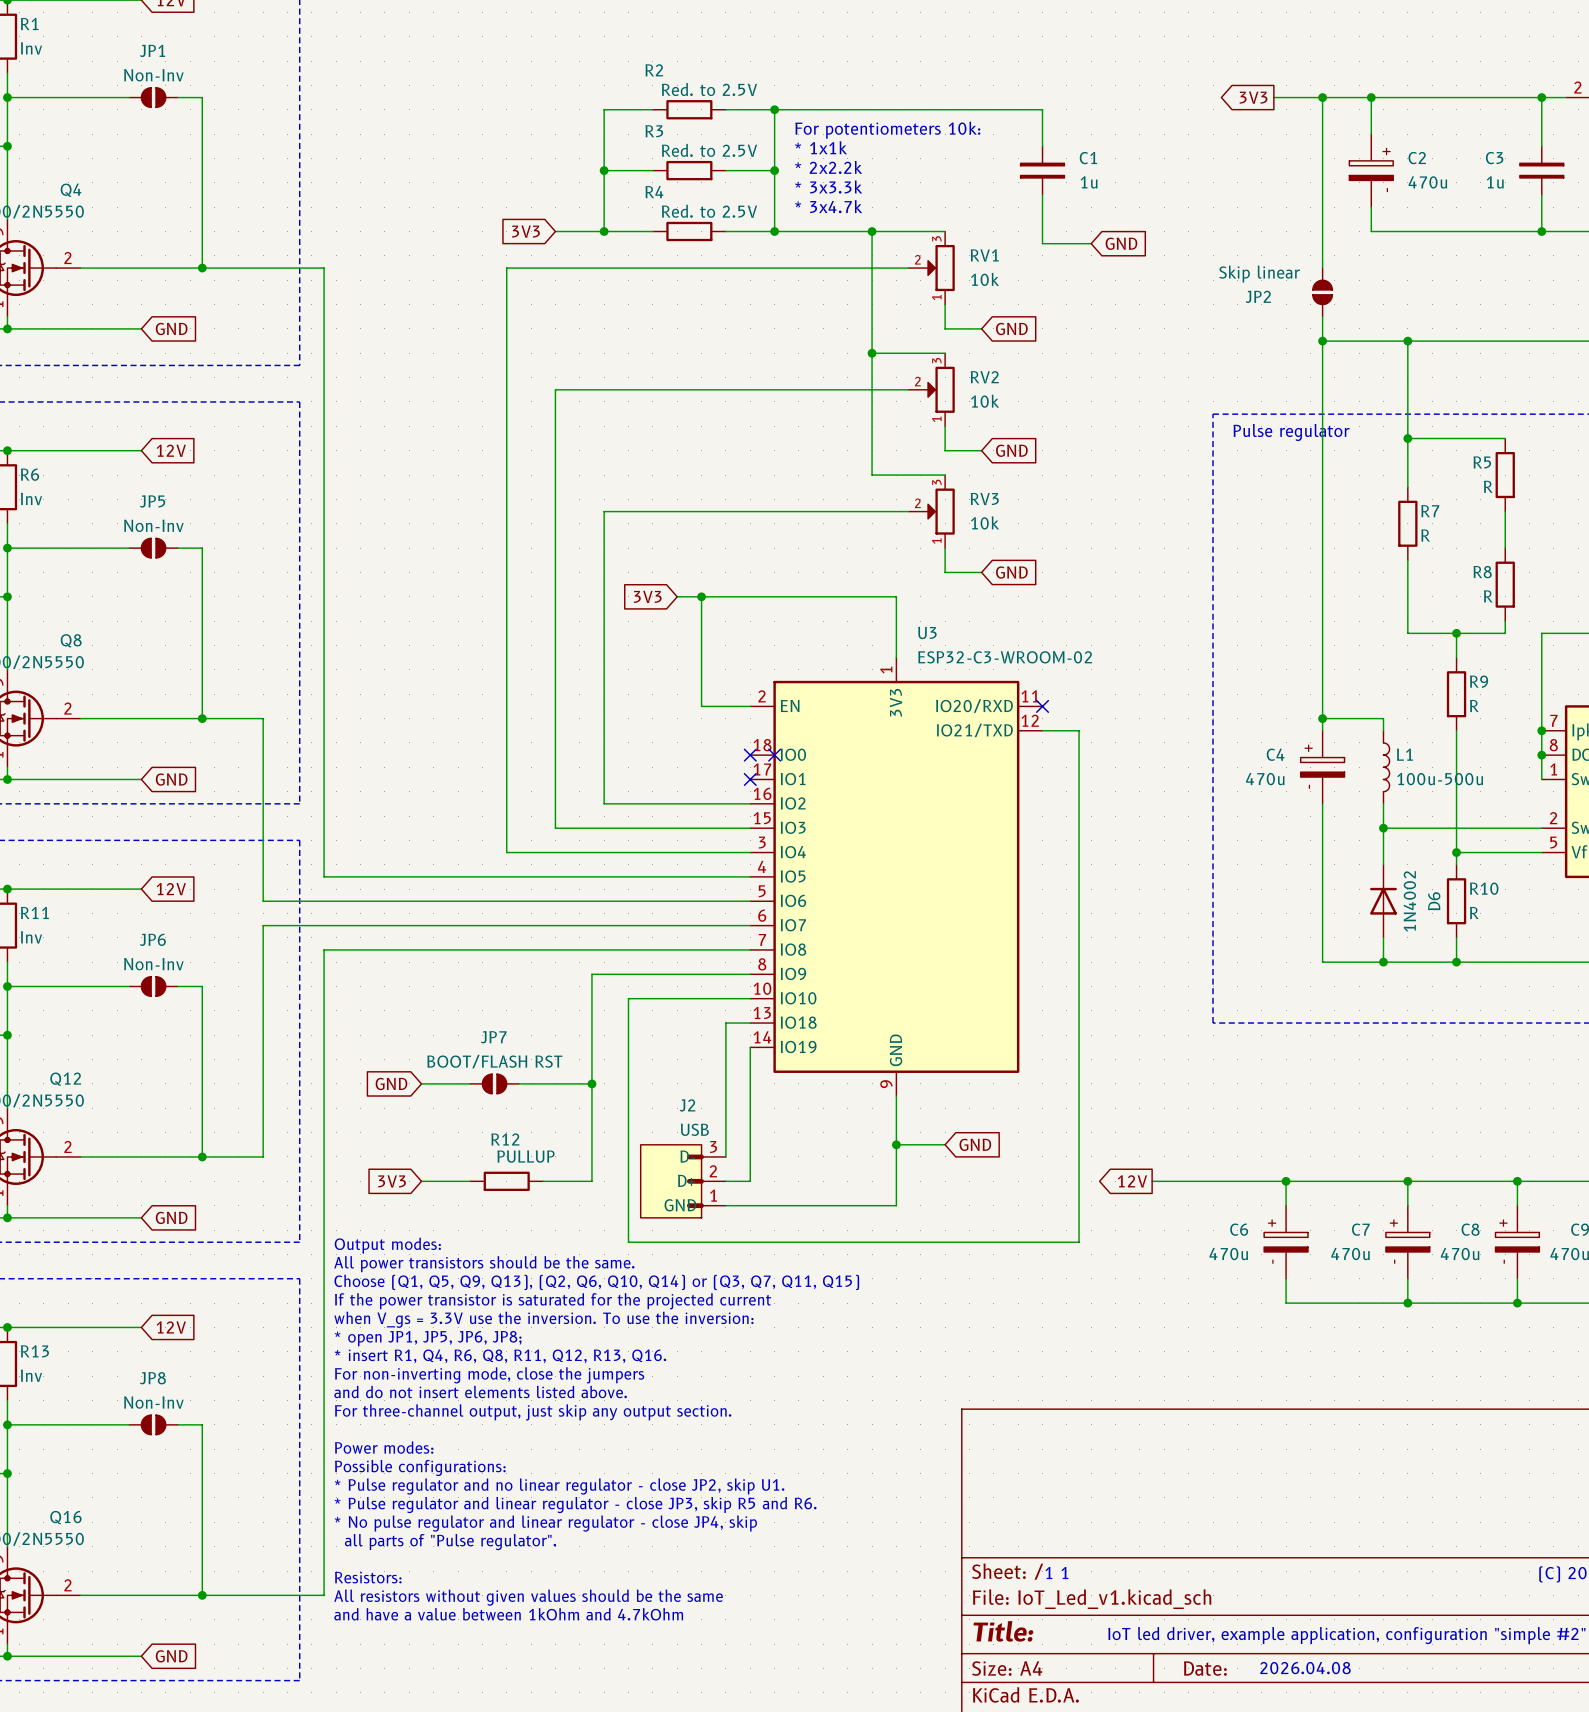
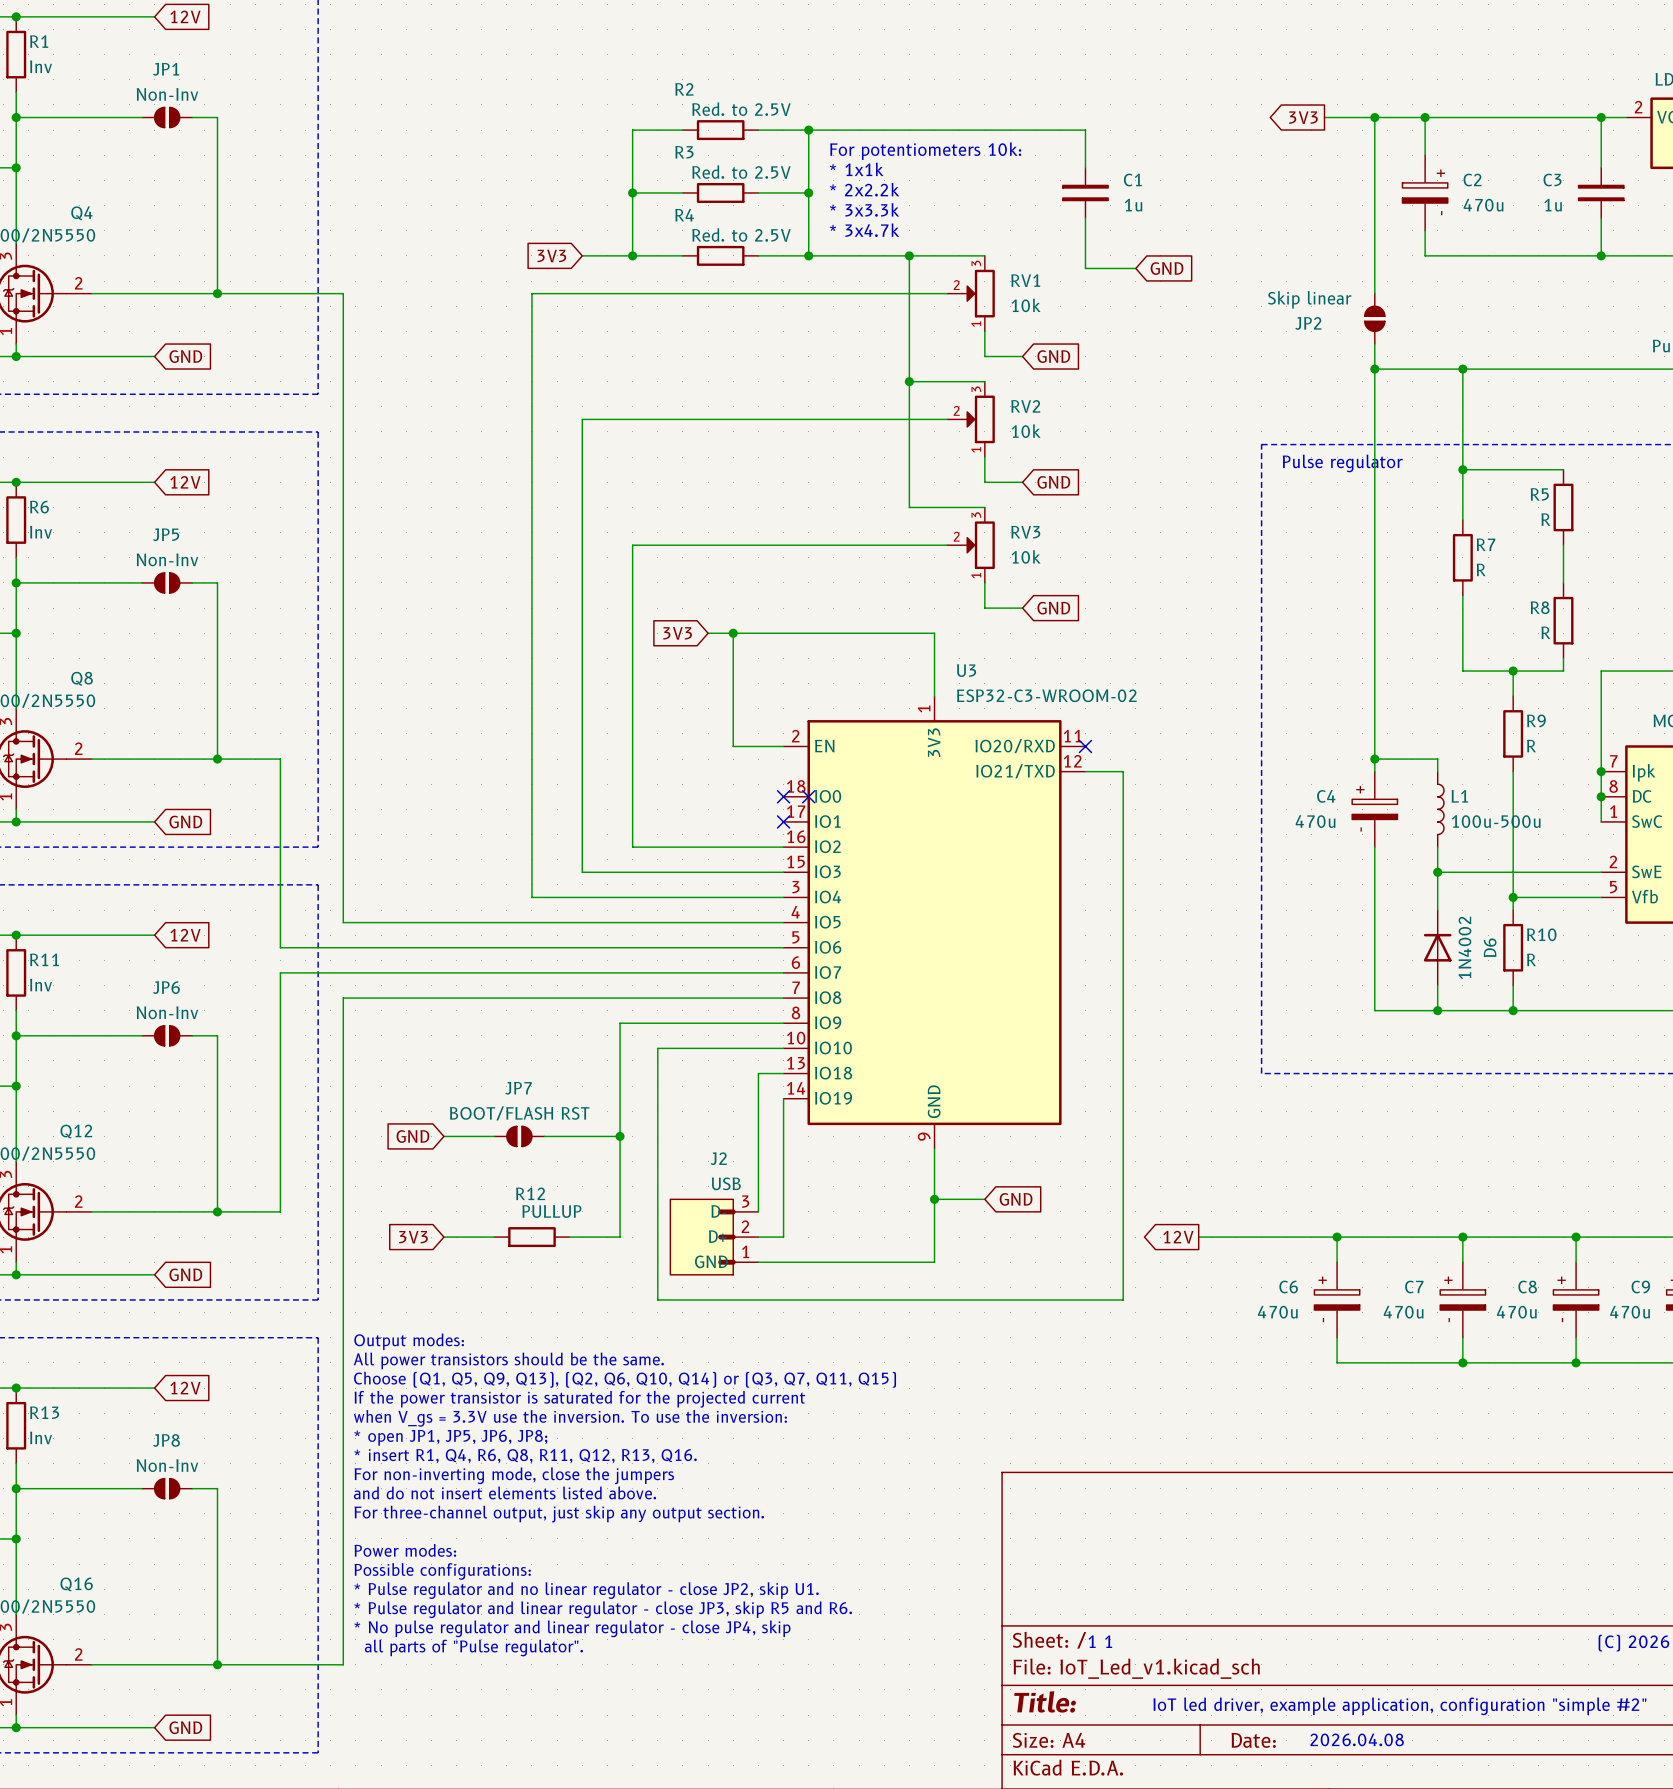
text: Output modes: (387, 1245) -> none
text: All power transistors should be the same. (484, 1264) -> none
text: Choose (Q1, Q5, Q9, Q13), (Q2, Q6, Q10, Q14) or (Q3, Q7, Q11, Q15) (596, 1282) -> Output modes: (409, 1341)
text: If the power transistor is saturated for the projected current (553, 1301) -> All power transistors should be the same. (508, 1360)
text: when V_gs = 3.3V use the inversion. To use the inversion: (543, 1319) -> Choose (Q1, Q5, Q9, Q13), (Q2, Q6, Q10, Q14) or (Q3, Q7, Q11, Q15) (625, 1379)
text: * open JP1, JP5, JP6, JP8; (428, 1338) -> If the power transistor is saturated for the projected current (579, 1399)
text: * insert R1, Q4, R6, Q8, R11, Q12, R13, Q16. (500, 1356) -> when V_gs = 3.3V use the inversion. To use the inversion: (570, 1418)
text: For non-inverting mode, close the jumpers (489, 1375) -> * open JP1, JP5, JP6, JP8; (450, 1437)
text: and do not insert elements listed above. (480, 1392) -> * insert R1, Q4, R6, Q8, R11, Q12, R13, Q16. (525, 1456)
text: For three-channel output, just skip any output section. (533, 1412) -> For non-inverting mode, close the jumpers (514, 1475)
text: none -> and do not insert elements listed above. (505, 1492)
text: Power modes: (384, 1447) -> For three-channel output, just skip any output section. (559, 1514)
text: Possible configurations: (420, 1467) -> none
text: * Pulse regulator and no linear regulator - close JP2, skip U1. (559, 1486) -> Power modes: (405, 1550)
text: * Pulse regulator and linear regulator - close JP3, skip R5 and R6. (575, 1505) -> Possible configurations: (442, 1571)
text: * No pulse regulator and linear regulator - close JP4, skip (545, 1523) -> * Pulse regulator and no linear regulator - close JP2, skip U1. (586, 1590)
text: all parts of "Pulse regulator". (450, 1542) -> * Pulse regulator and linear regulator - close JP3, skip R5 and R6. (603, 1609)
text: none -> * No pulse regulator and linear regulator - close JP4, skip (572, 1628)
text: Resistors: (368, 1577) -> all parts of "Pulse regulator". (473, 1648)
text: All resistors without given values should be the same (528, 1597) -> none
text: and have a value between 1kOhm and 4.7kOhm (508, 1614) -> none

